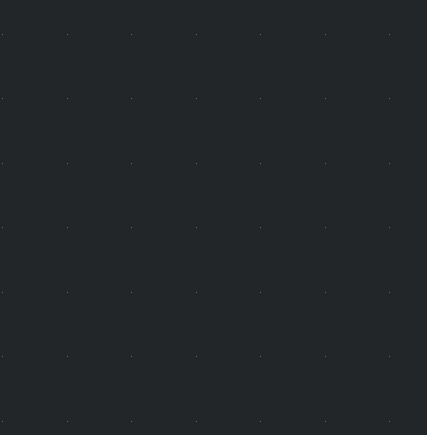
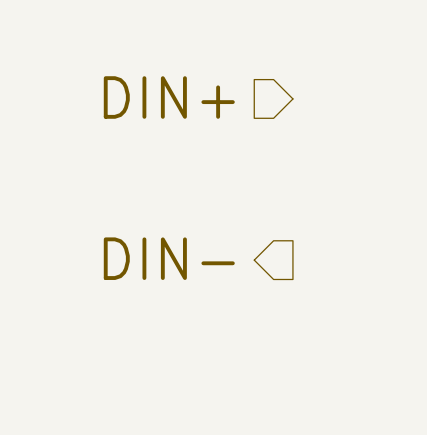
hierarchical label: none -> DIN+ (169, 97)
hierarchical label: none -> DIN- (169, 258)

